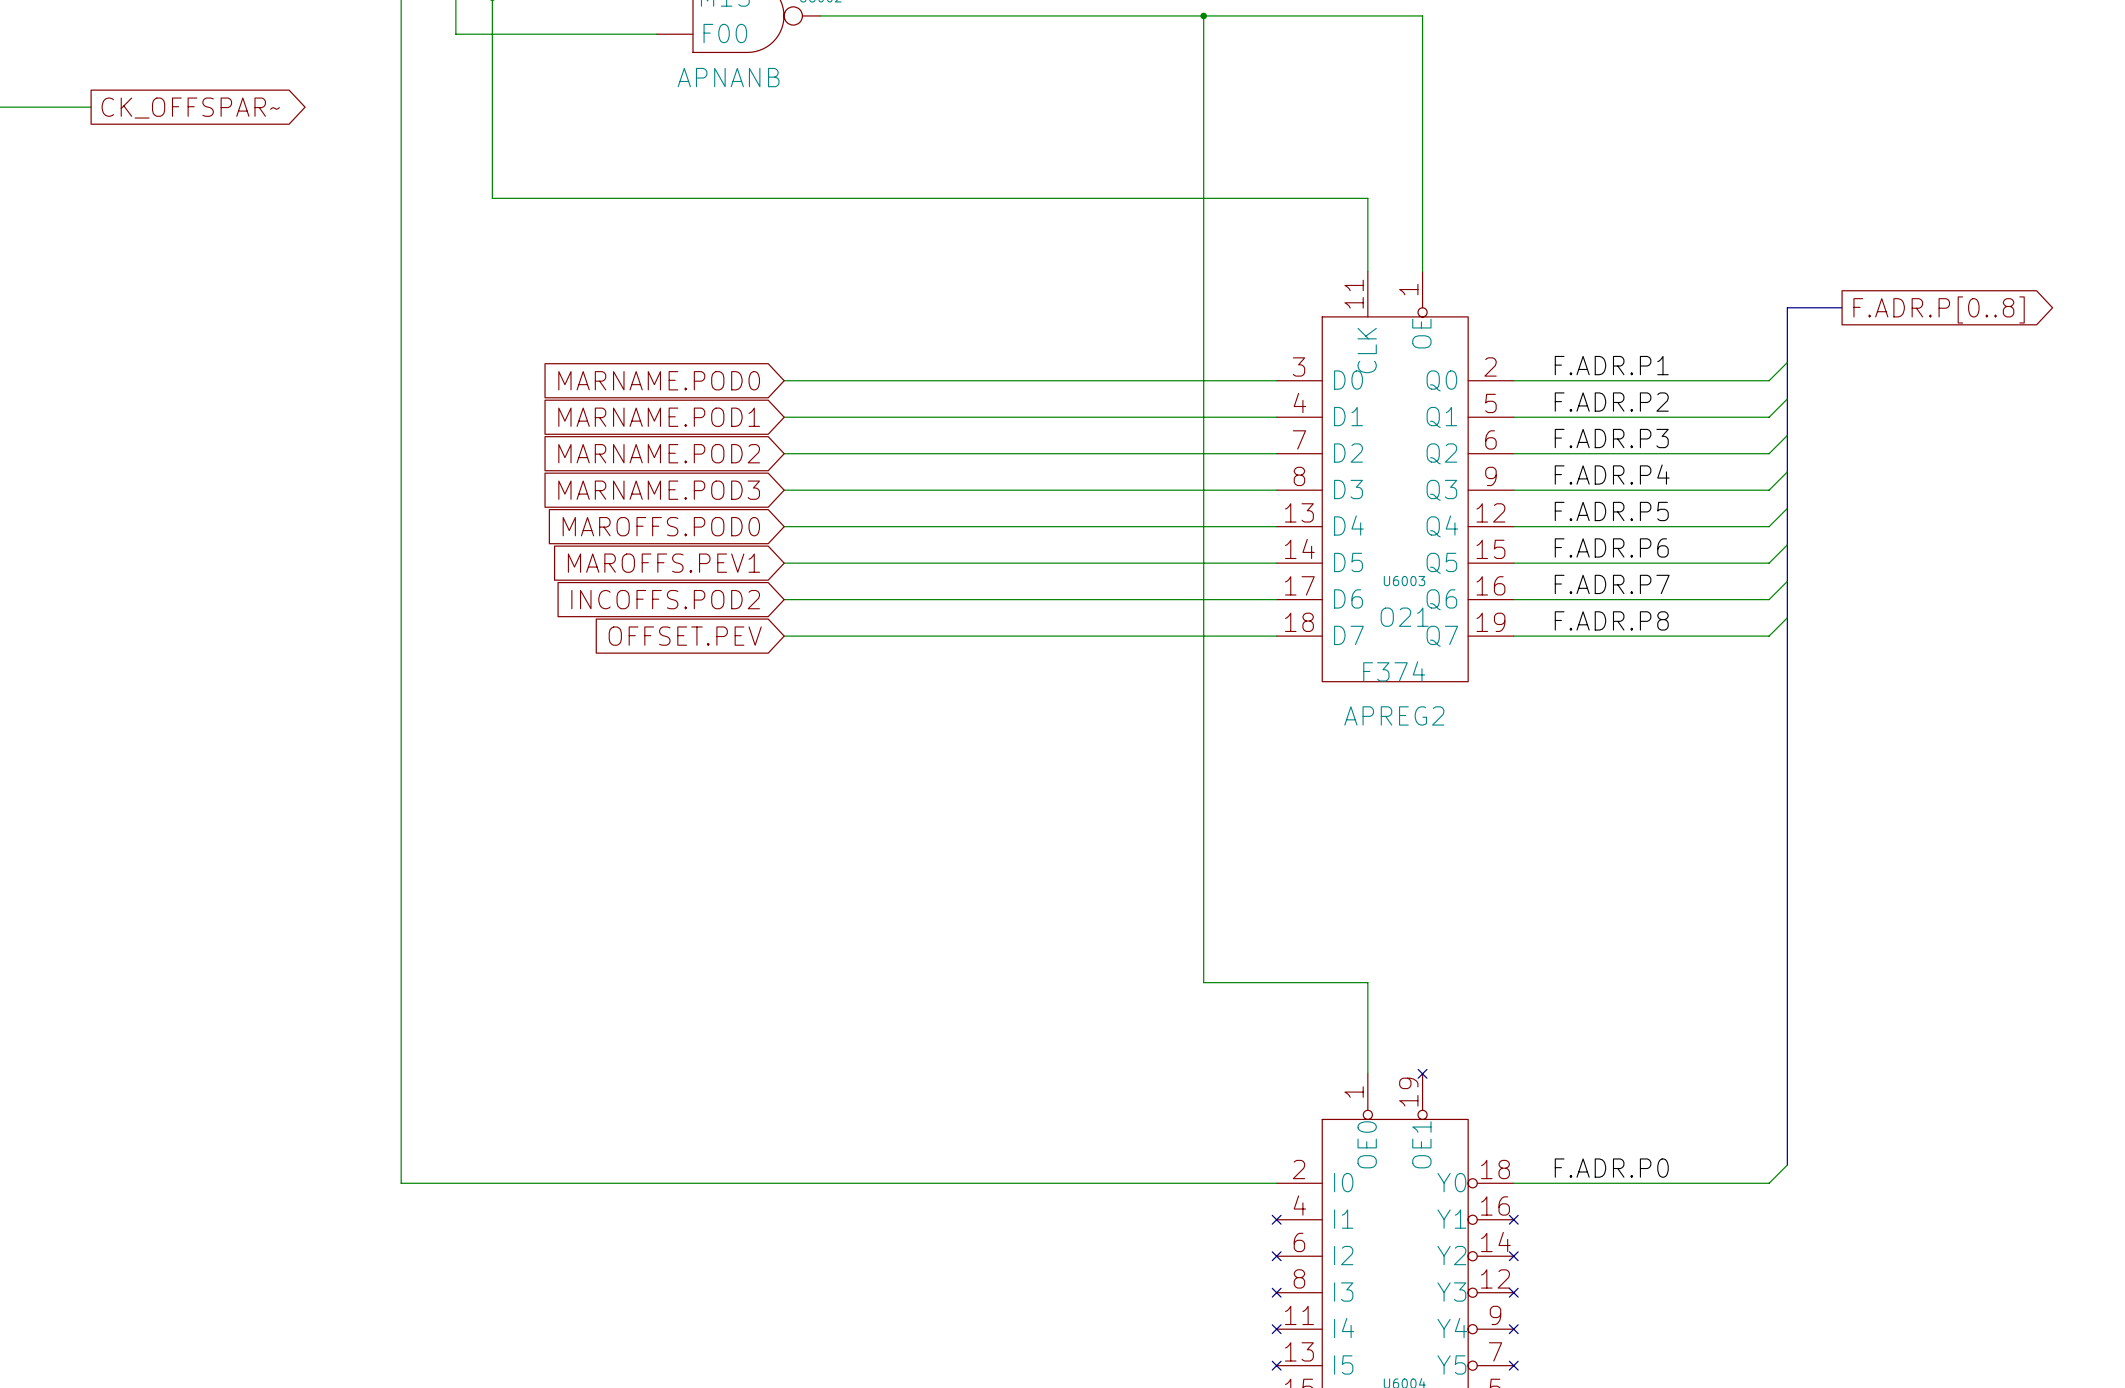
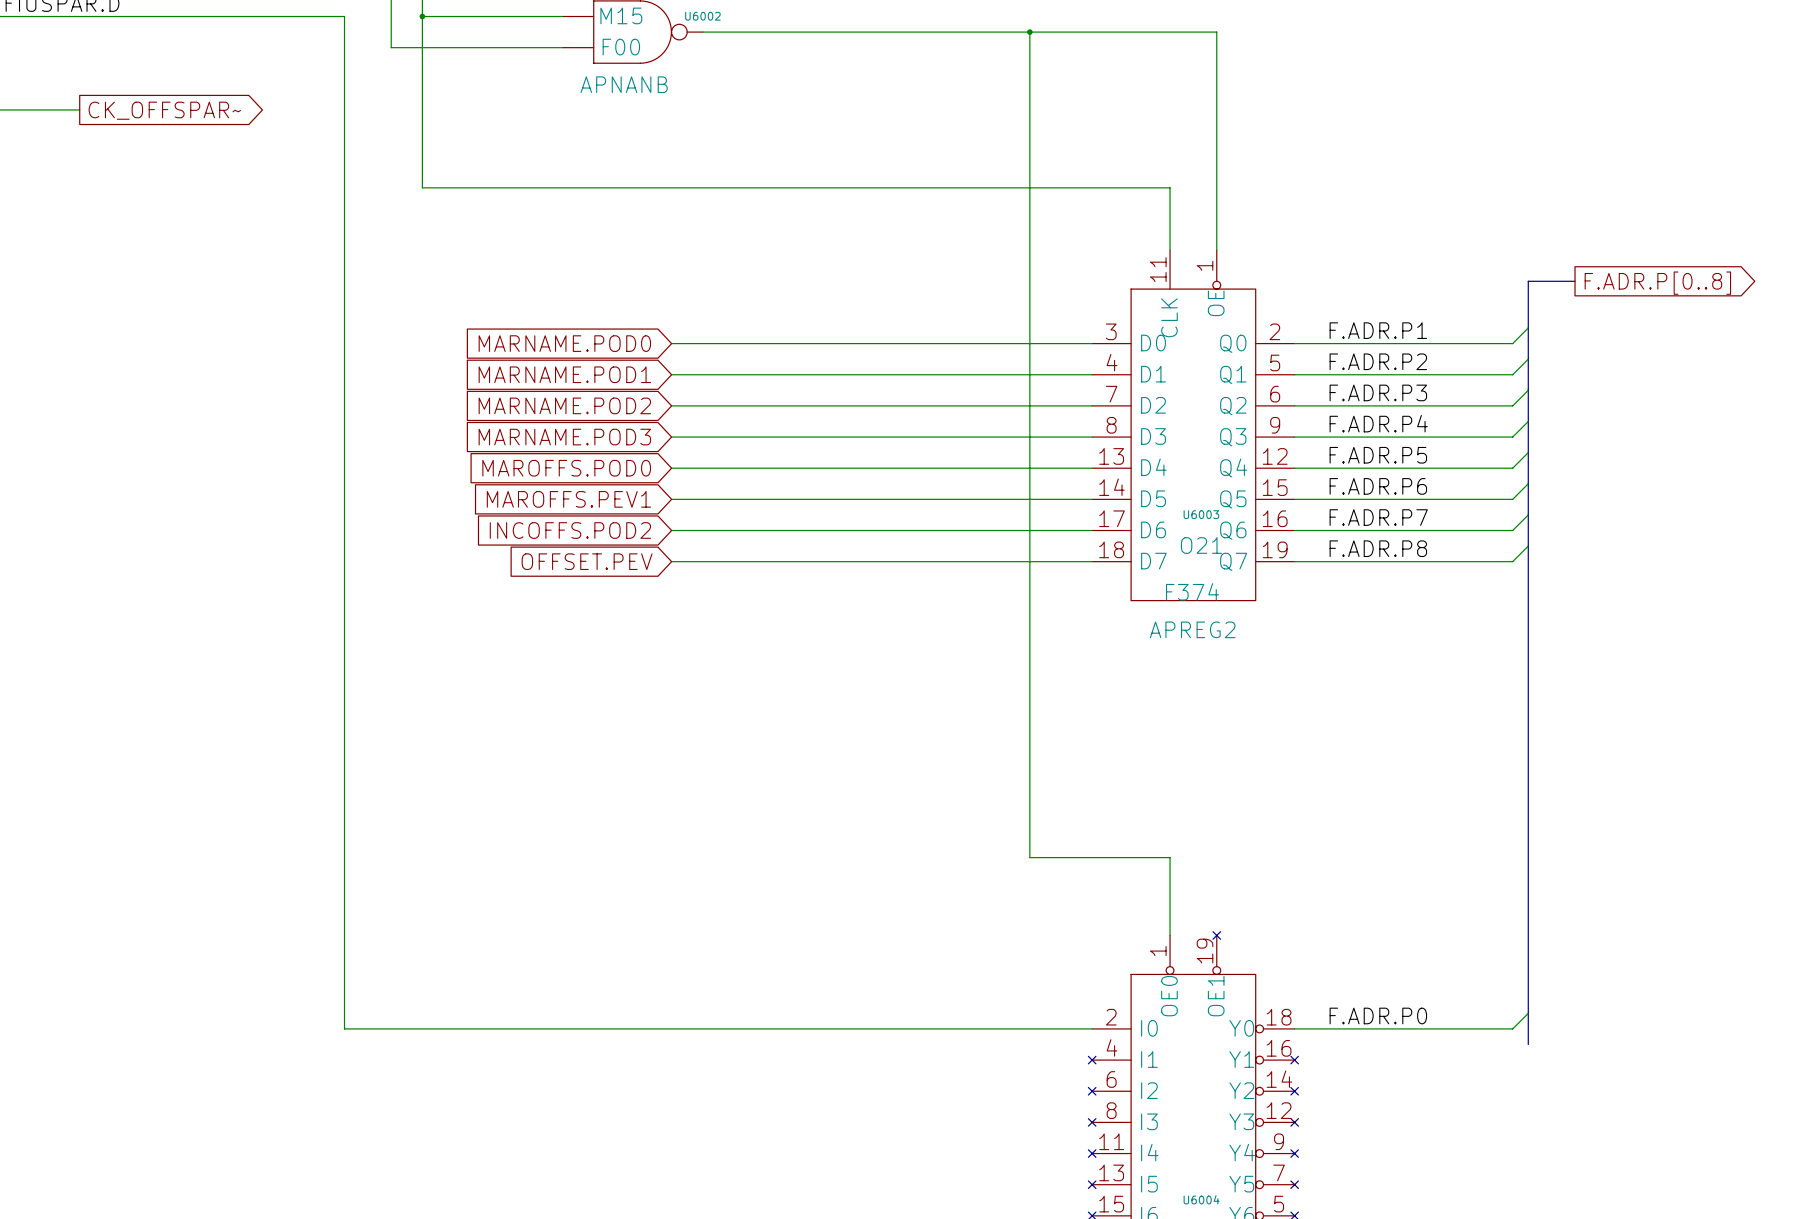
bus: none -> (1528, 1013) (1528, 1044)

